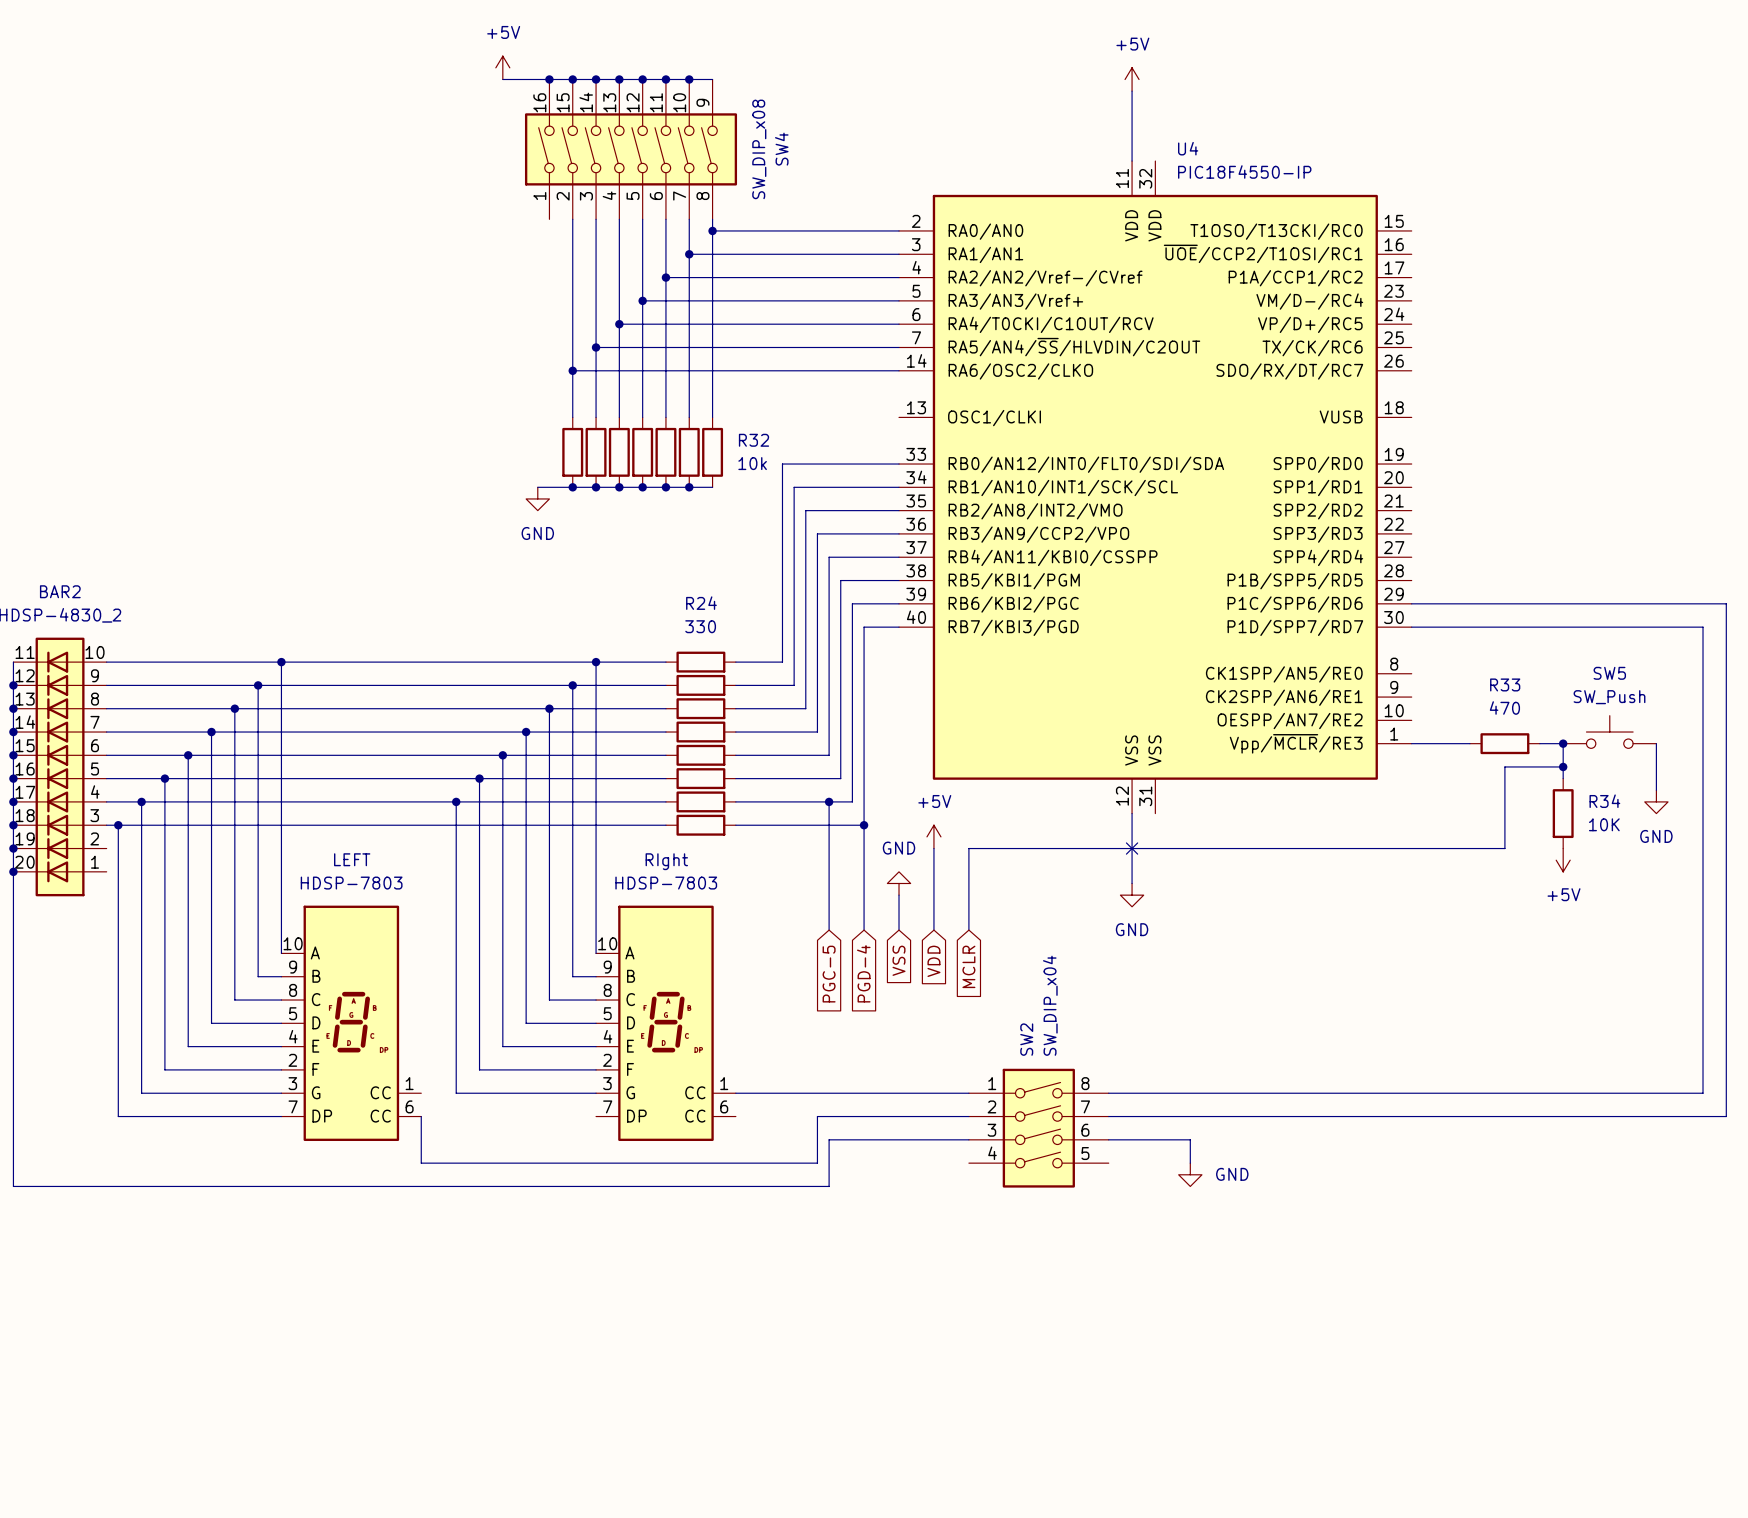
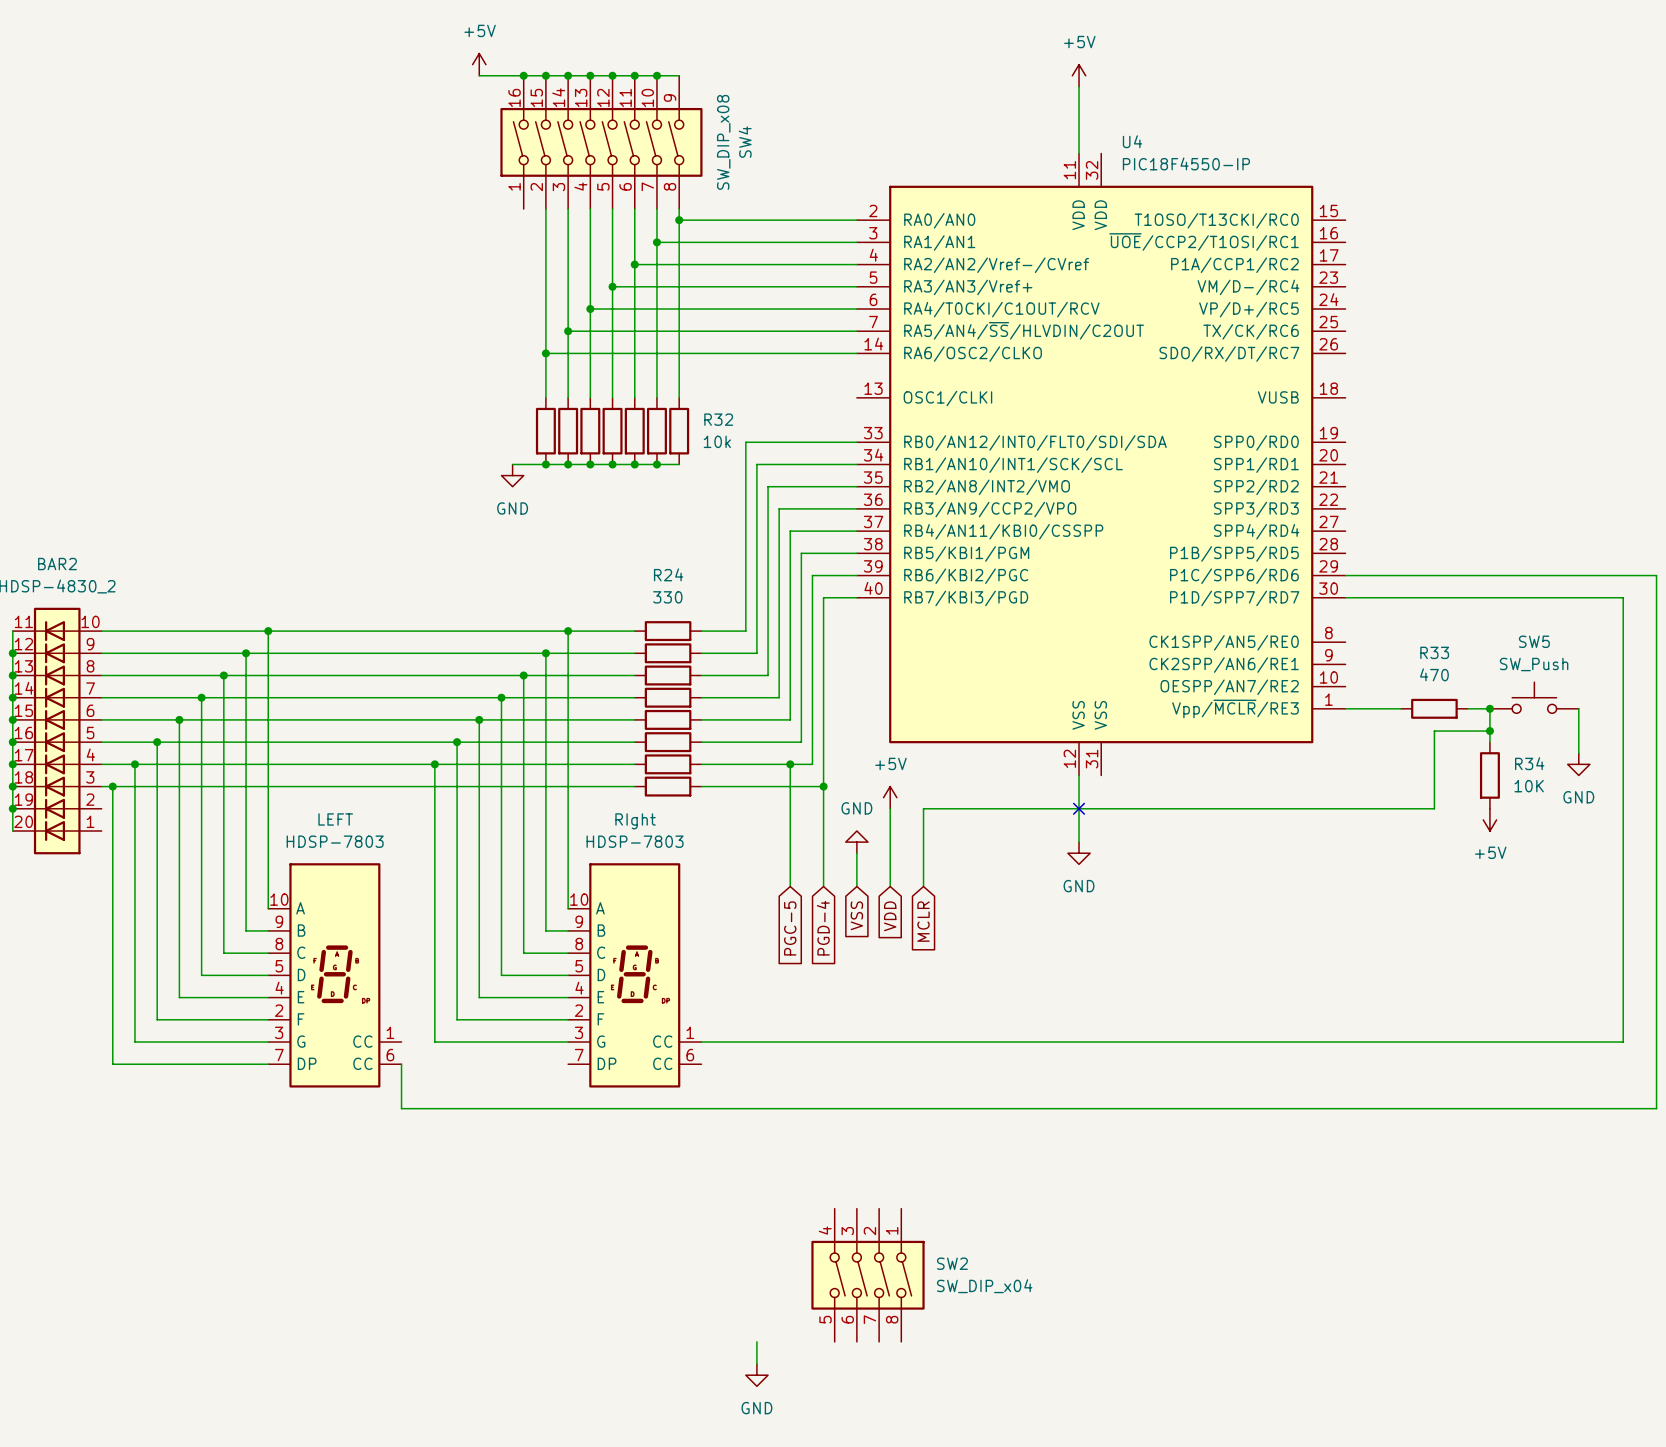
wire: (1726, 603) (1726, 1116) (1108, 1116) -> (1645, 575) (1656, 575) (1656, 1108) (779, 1108)
wire: (13, 871) (13, 1186) (829, 1186) (829, 1139) (968, 1139) -> none
junction: (13, 871) -> none
wire: (968, 1116) (817, 1116) (817, 1163) -> none
SW2 rotation: 0° (1038, 1128) -> 90° clockwise (867, 1275)
SW2 position: (1038, 1128) -> (867, 1275)
wire: (1108, 1139) (1190, 1139) (1190, 1163) -> none
power symbol: GND (1190, 1174) -> none
wire: none -> (756, 1341) (756, 1364)
power symbol: none -> GND (756, 1375)

